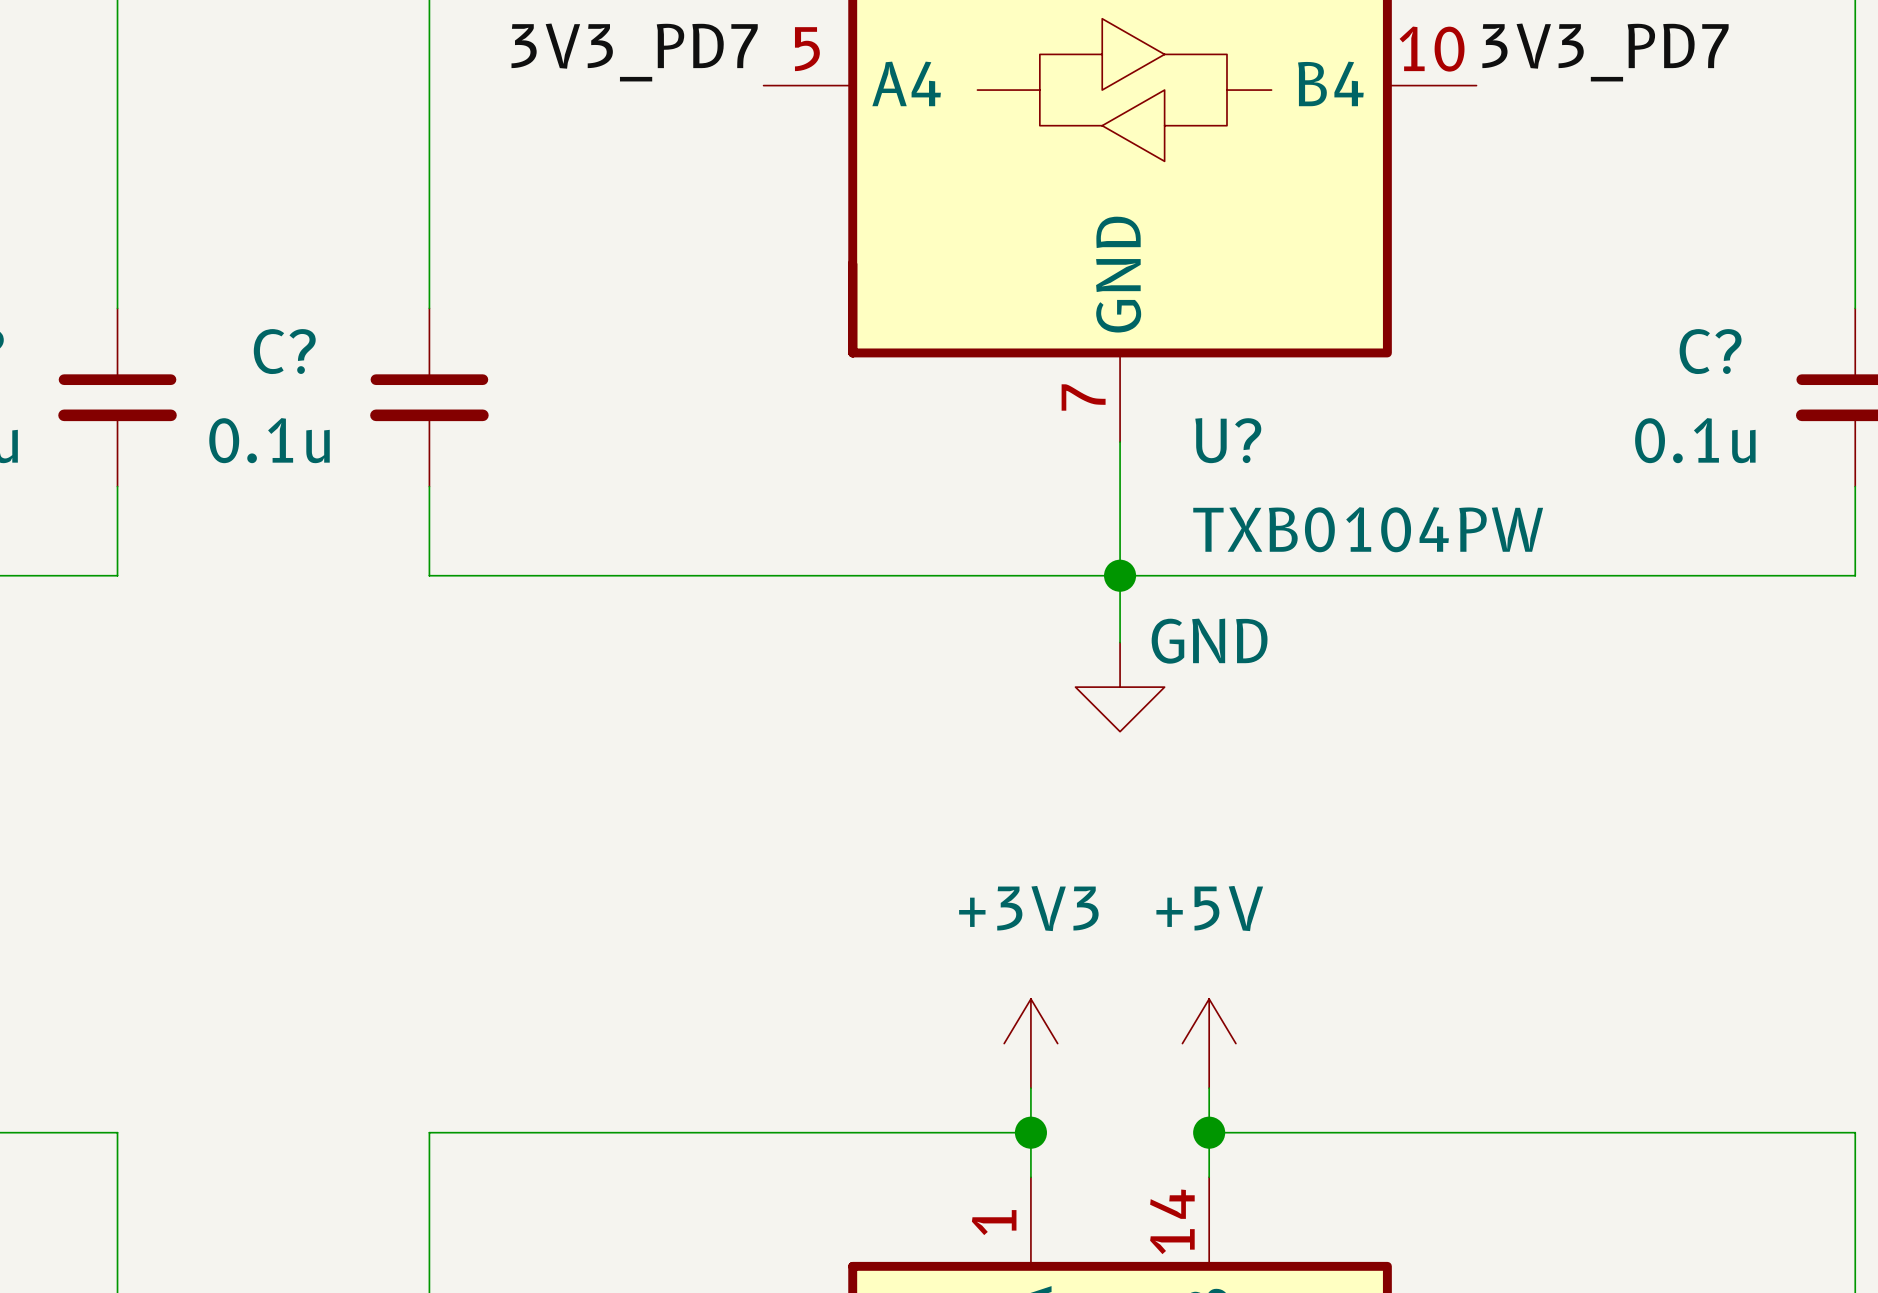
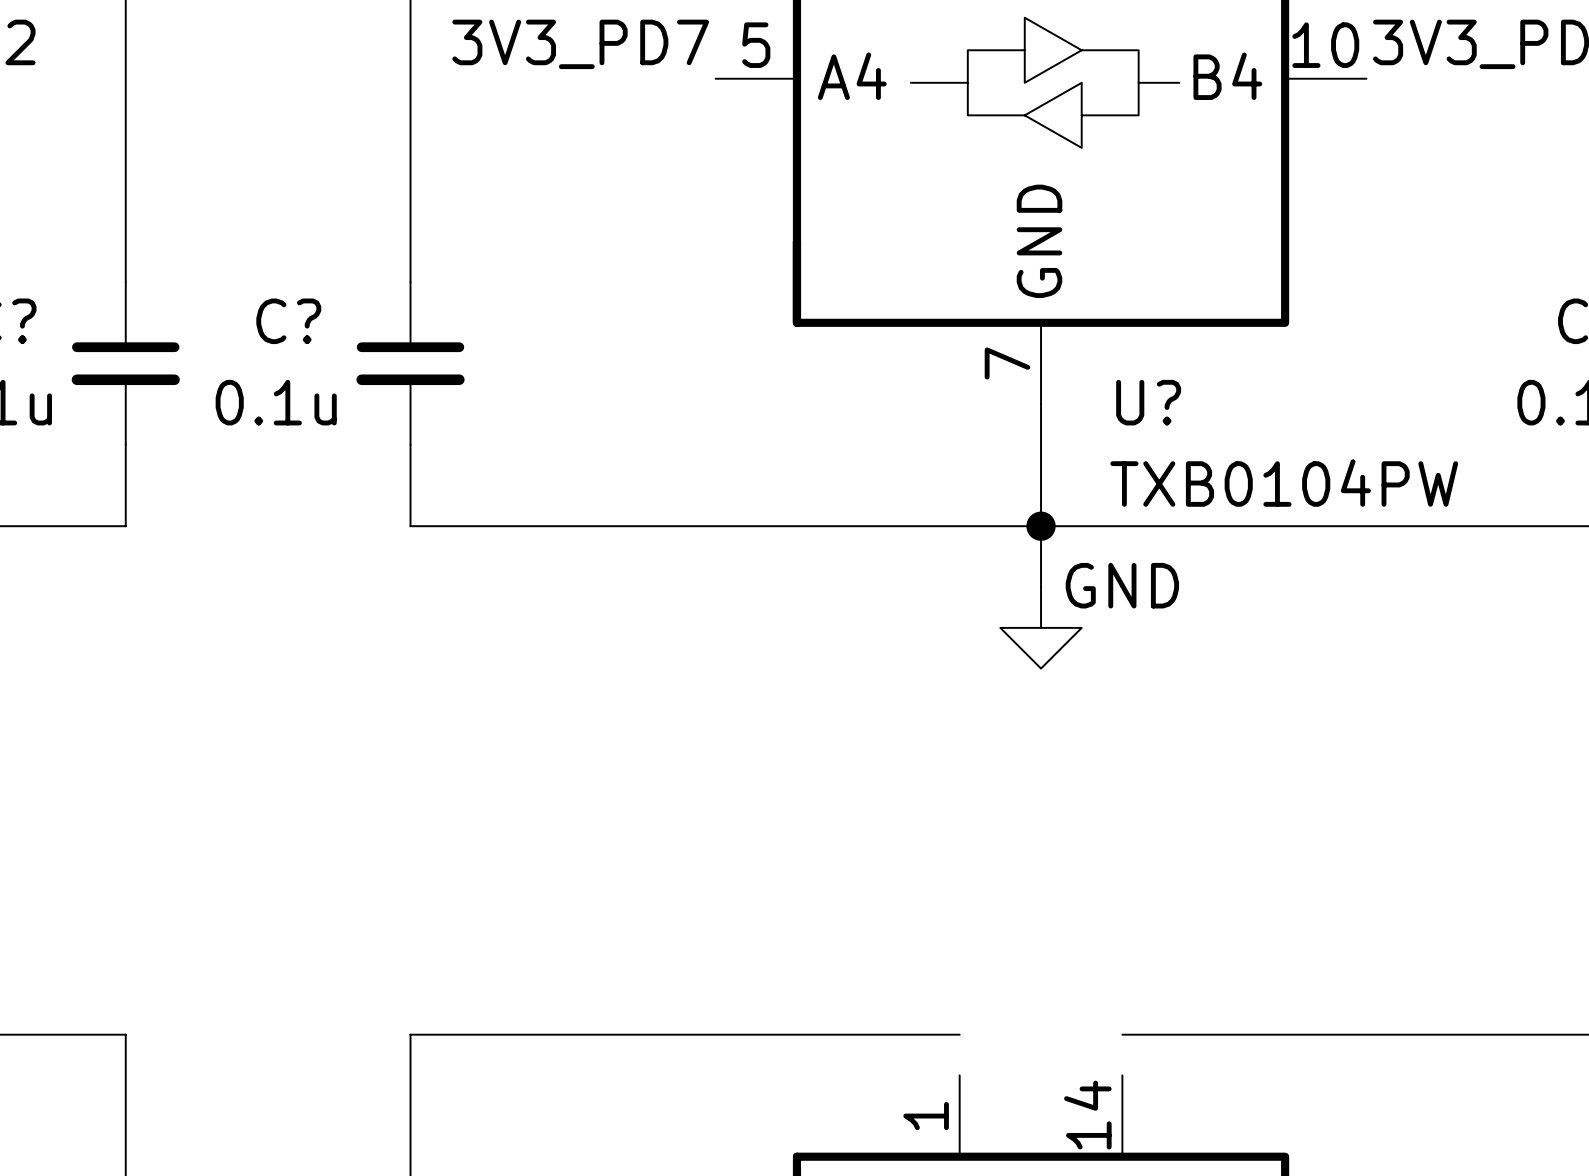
power symbol: +3V3 (1030, 1043) -> none
power symbol: +5V (1209, 1043) -> none
wire: (1030, 1088) (1030, 1177) -> none
wire: (1209, 1088) (1209, 1177) -> none
junction: (1030, 1132) -> none
junction: (1209, 1132) -> none

